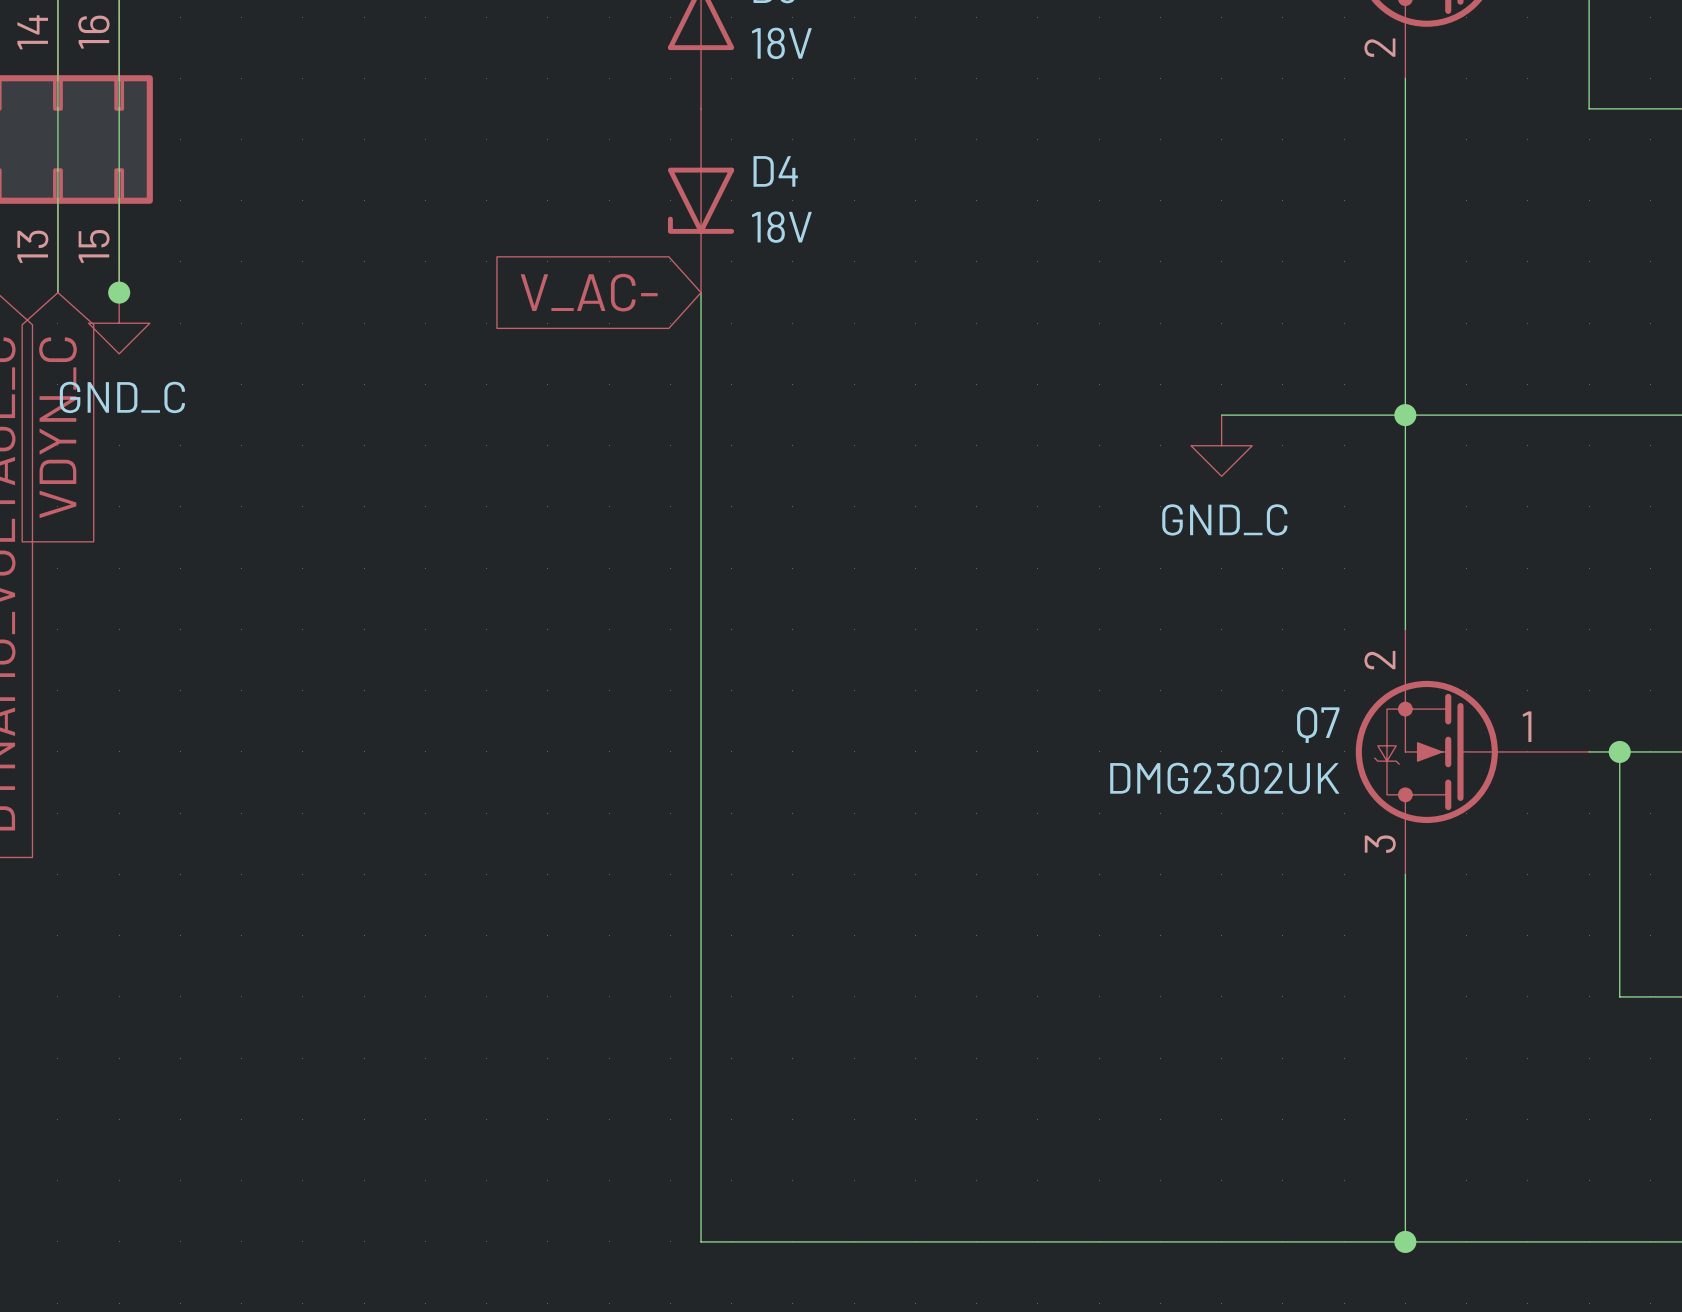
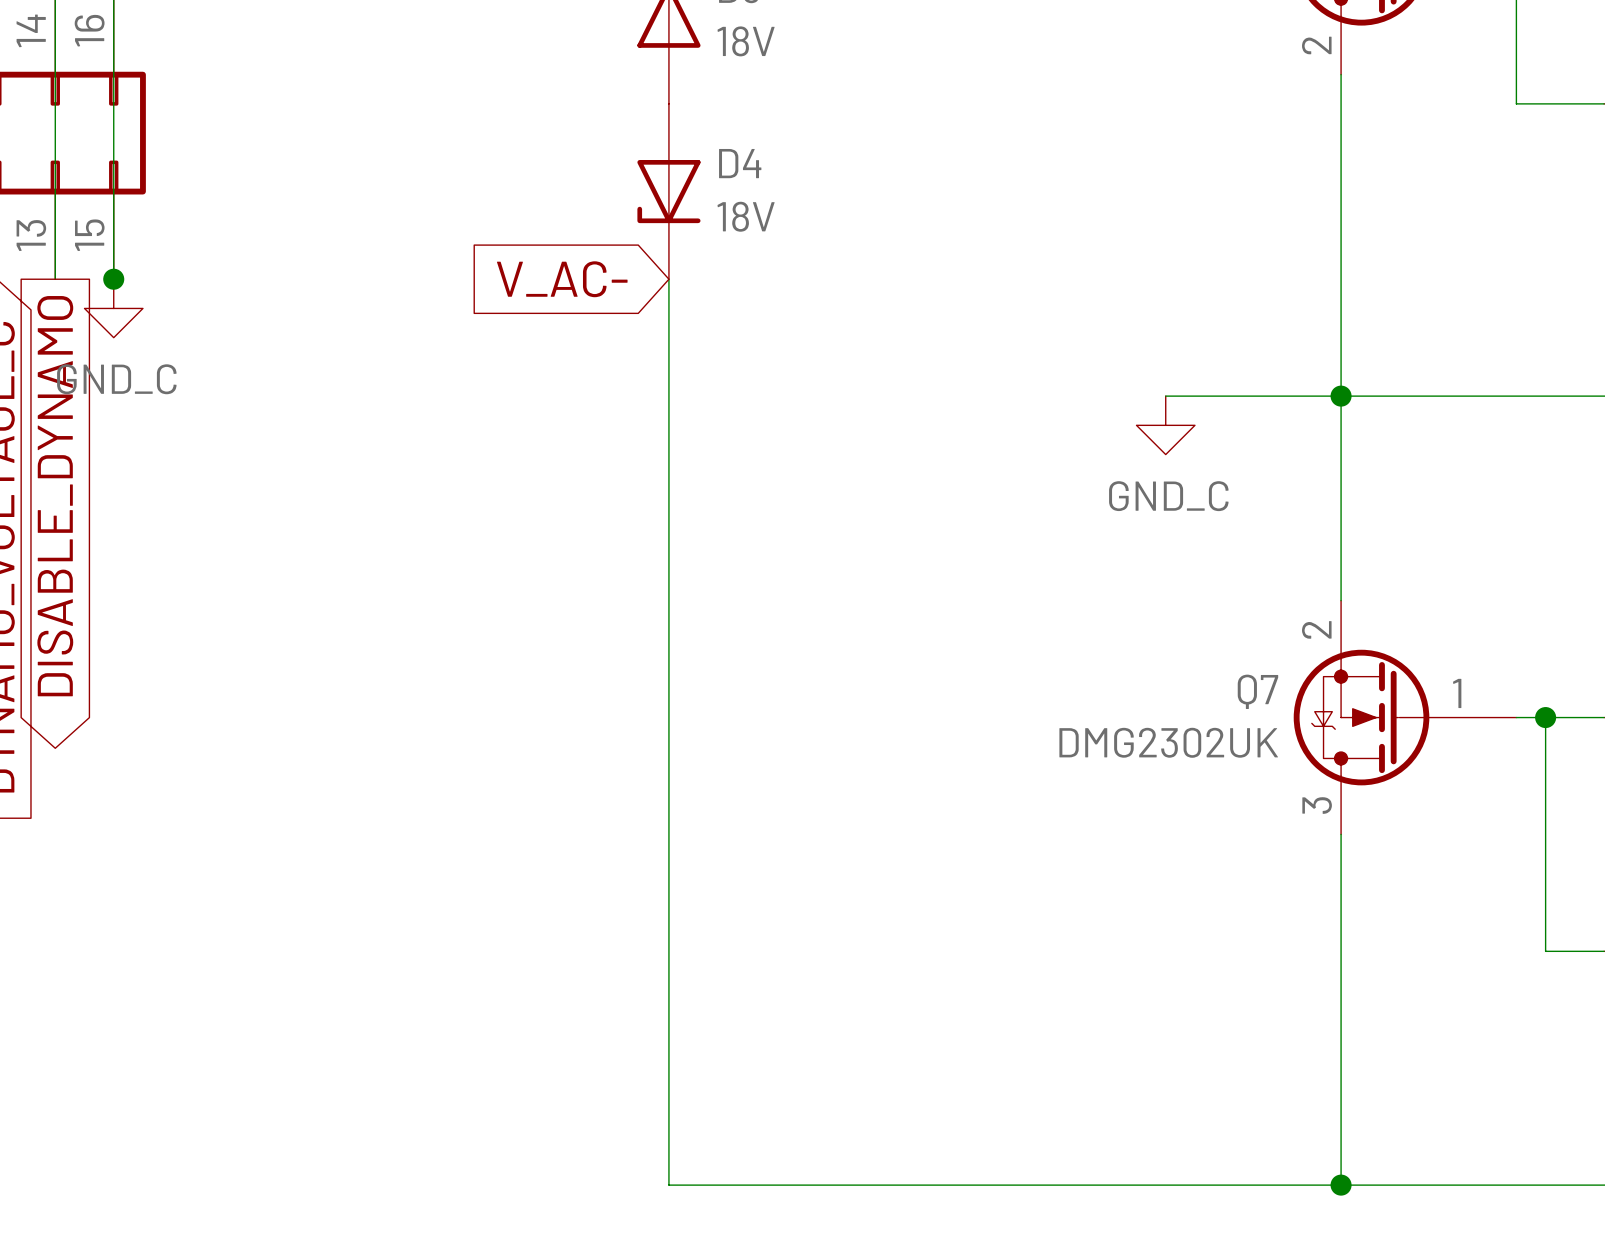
global label shape: input (57, 427) -> output (55, 496)
global label: VDYN_C (57, 427) -> DISABLE_DYNAMO (55, 496)

